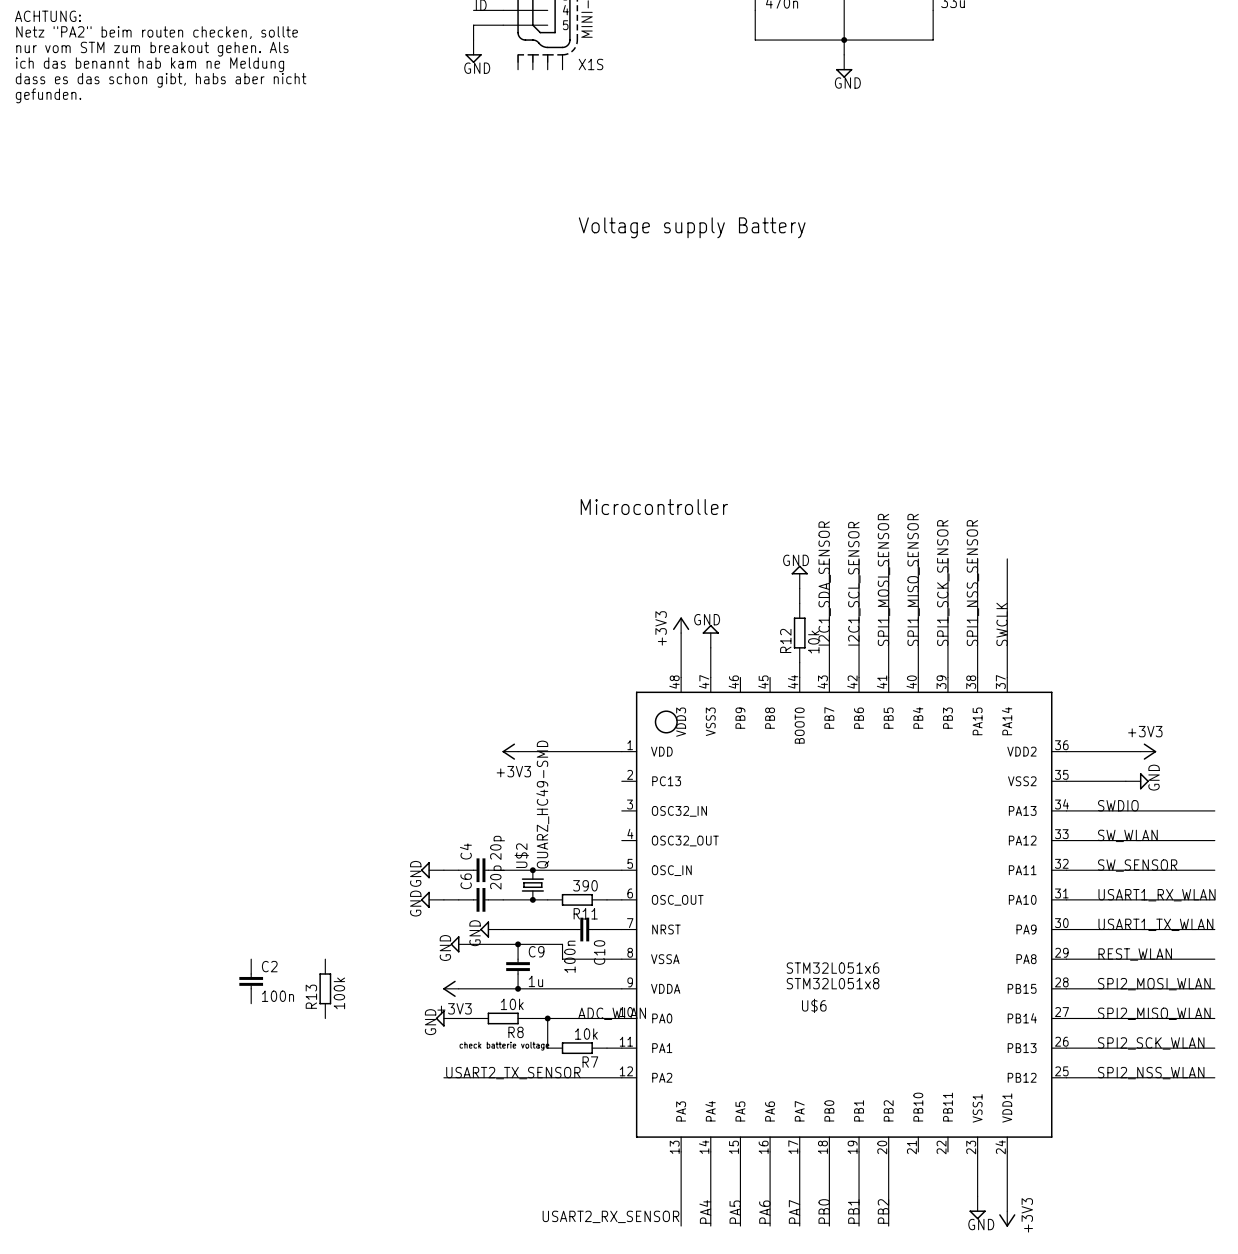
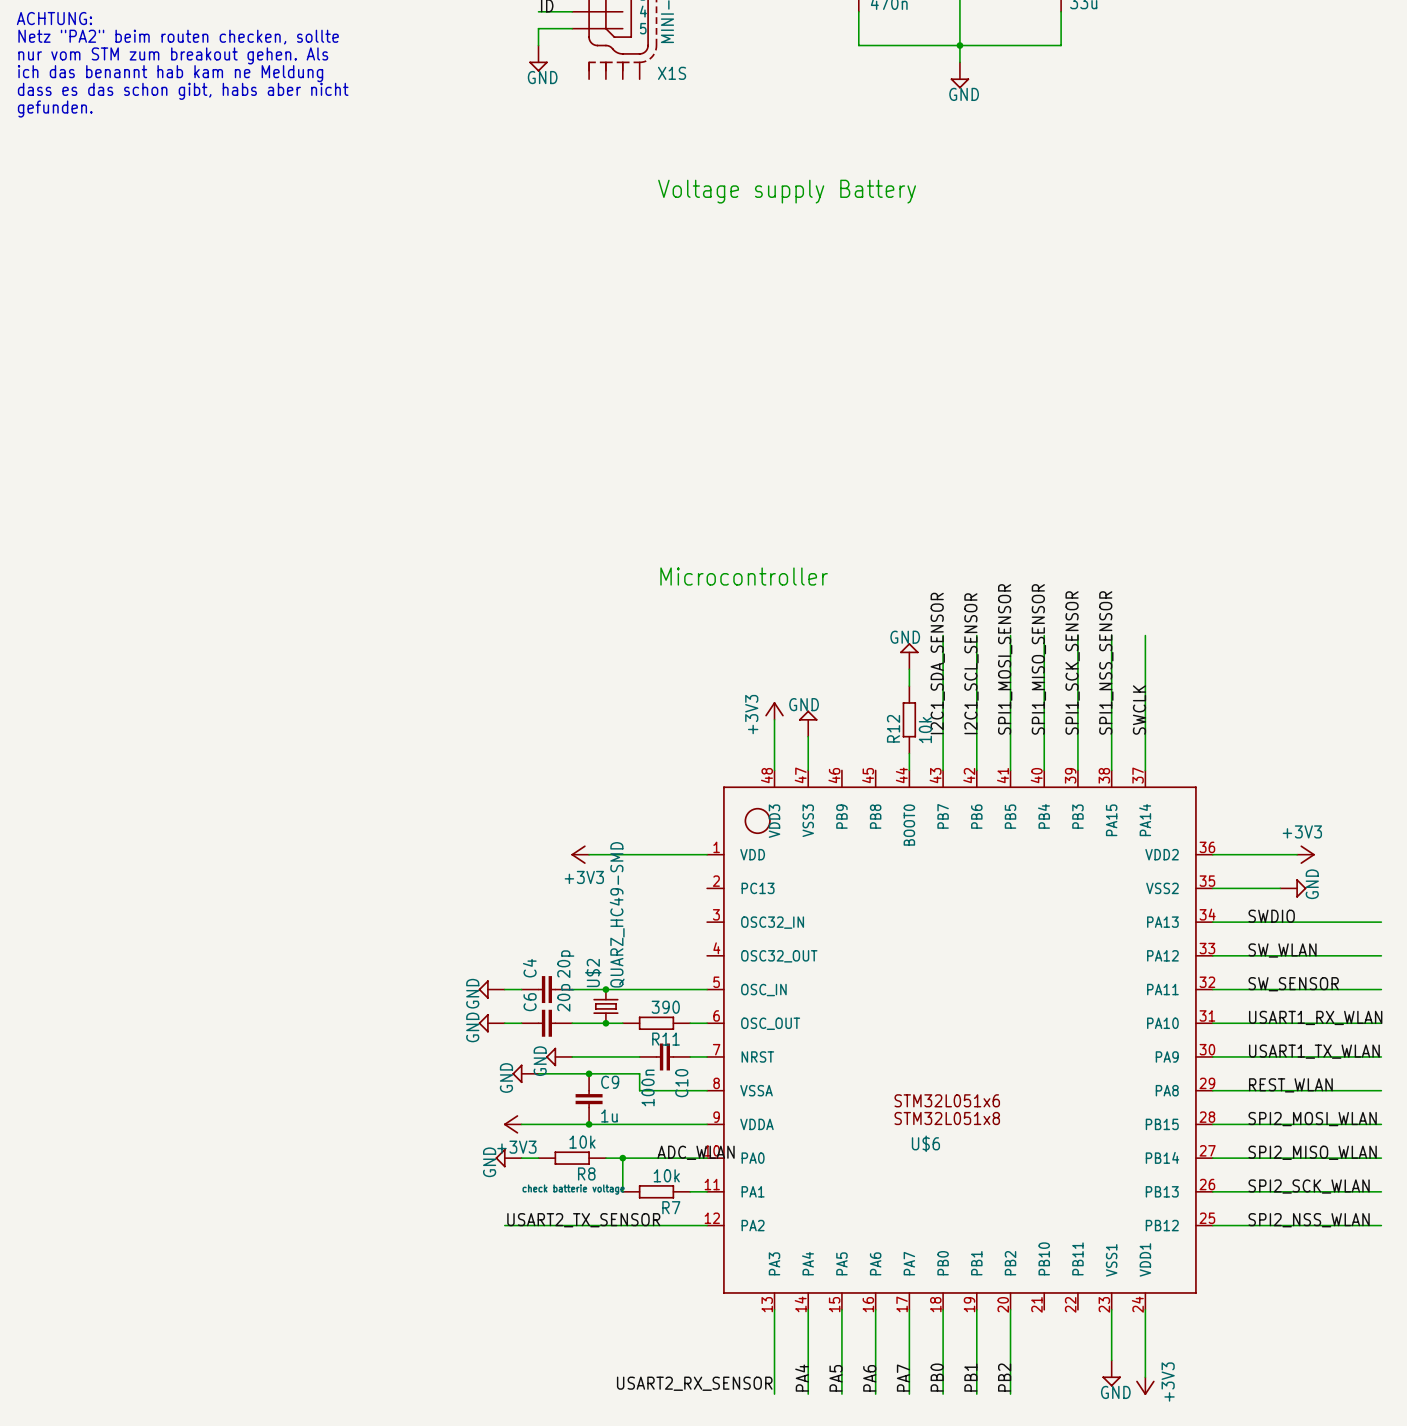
text position: Voltage supply Battery (692, 227) -> Voltage supply Battery (787, 191)
C2: 100n (251, 981) -> none
R13: 100k (325, 988) -> none

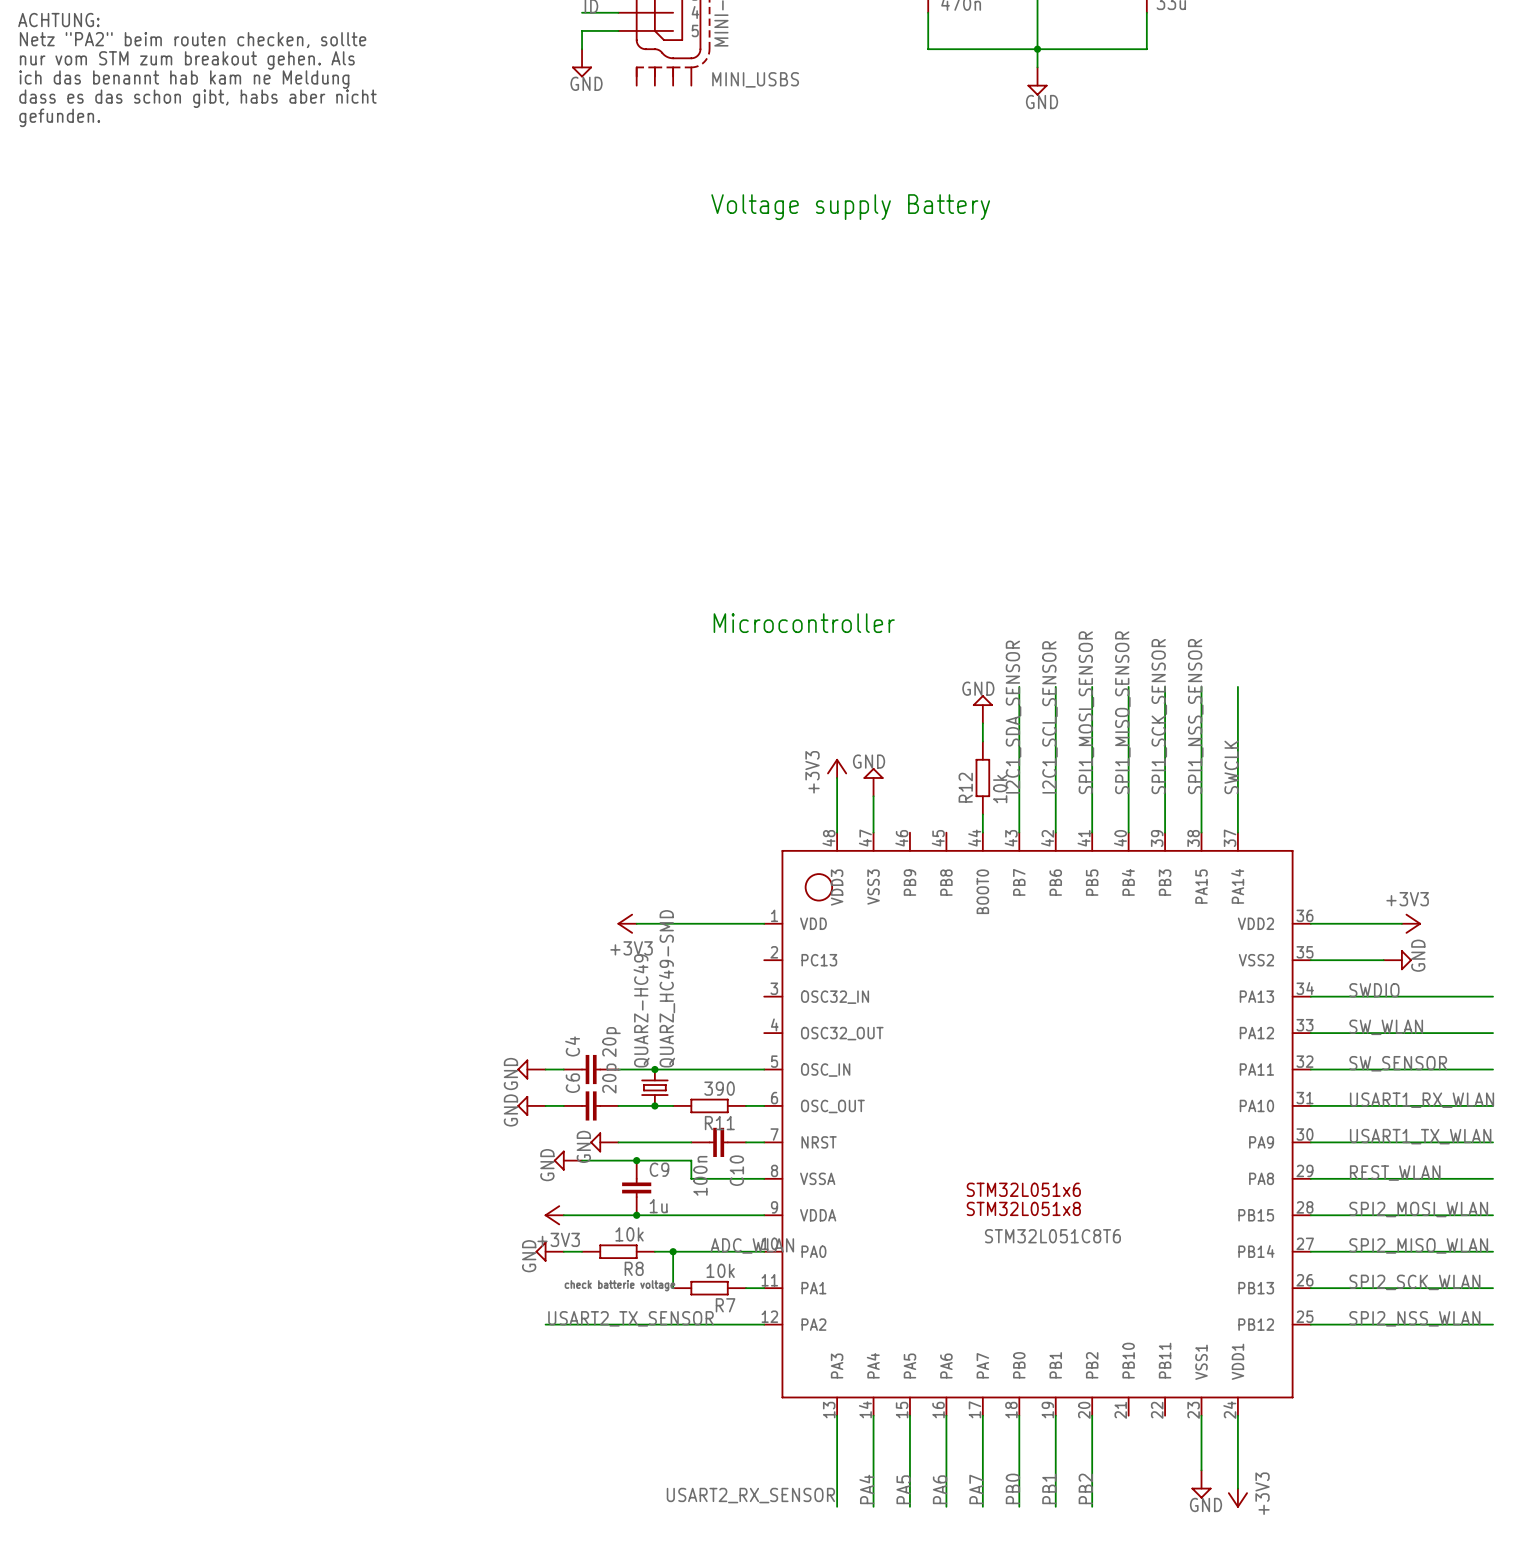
X1S name: X1S (672, 73) -> MINI_USBS (755, 79)
U$2 name: U$2 (593, 972) -> QUARZ-HC49 (641, 1010)
U$6 name: U$6 (925, 1143) -> STM32L051C8T6 (1052, 1236)

